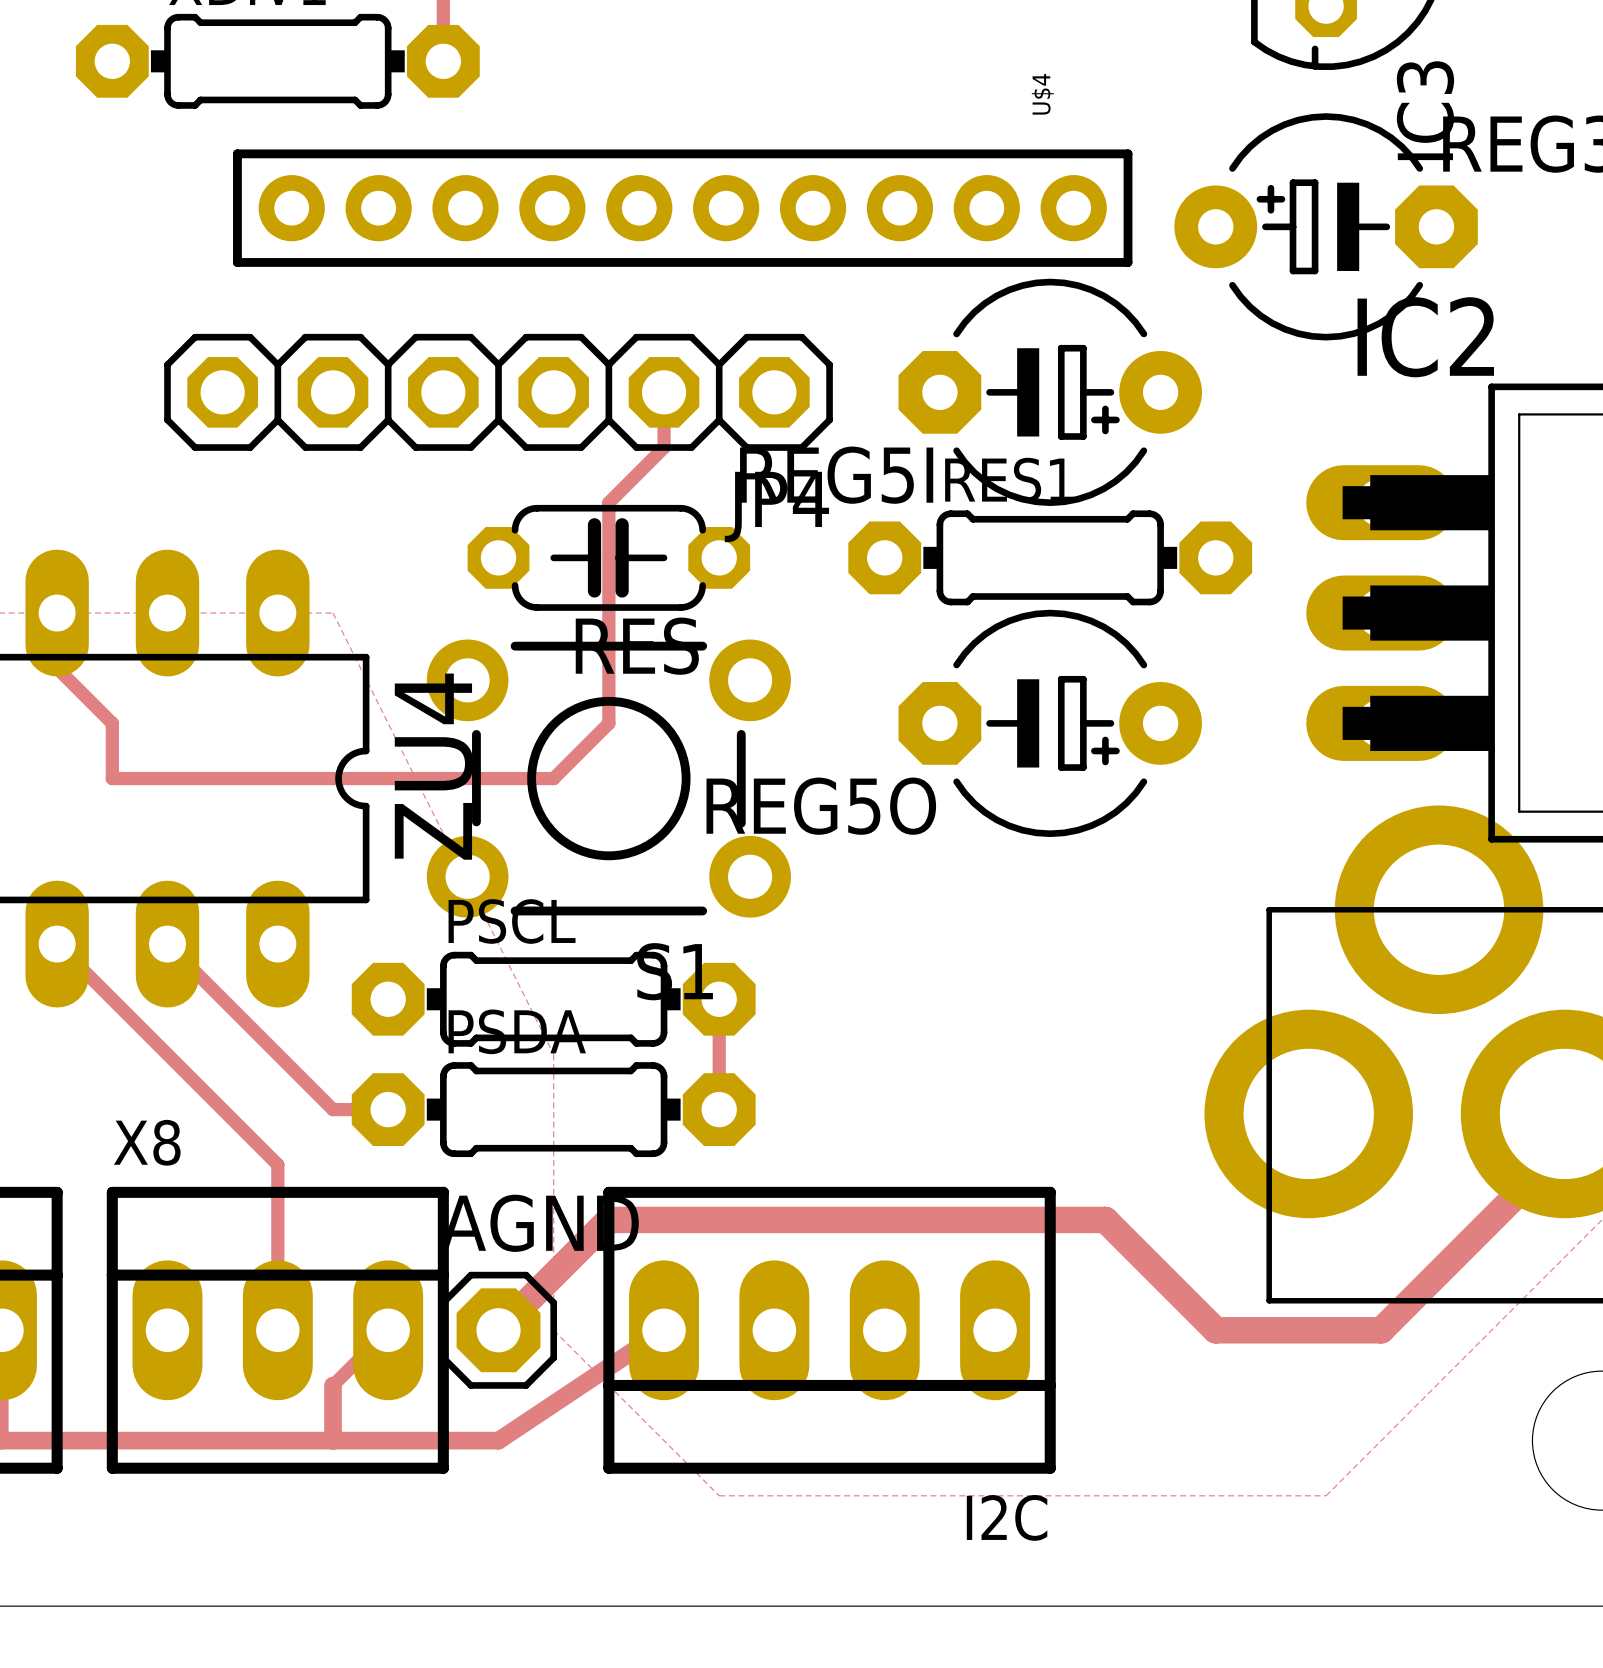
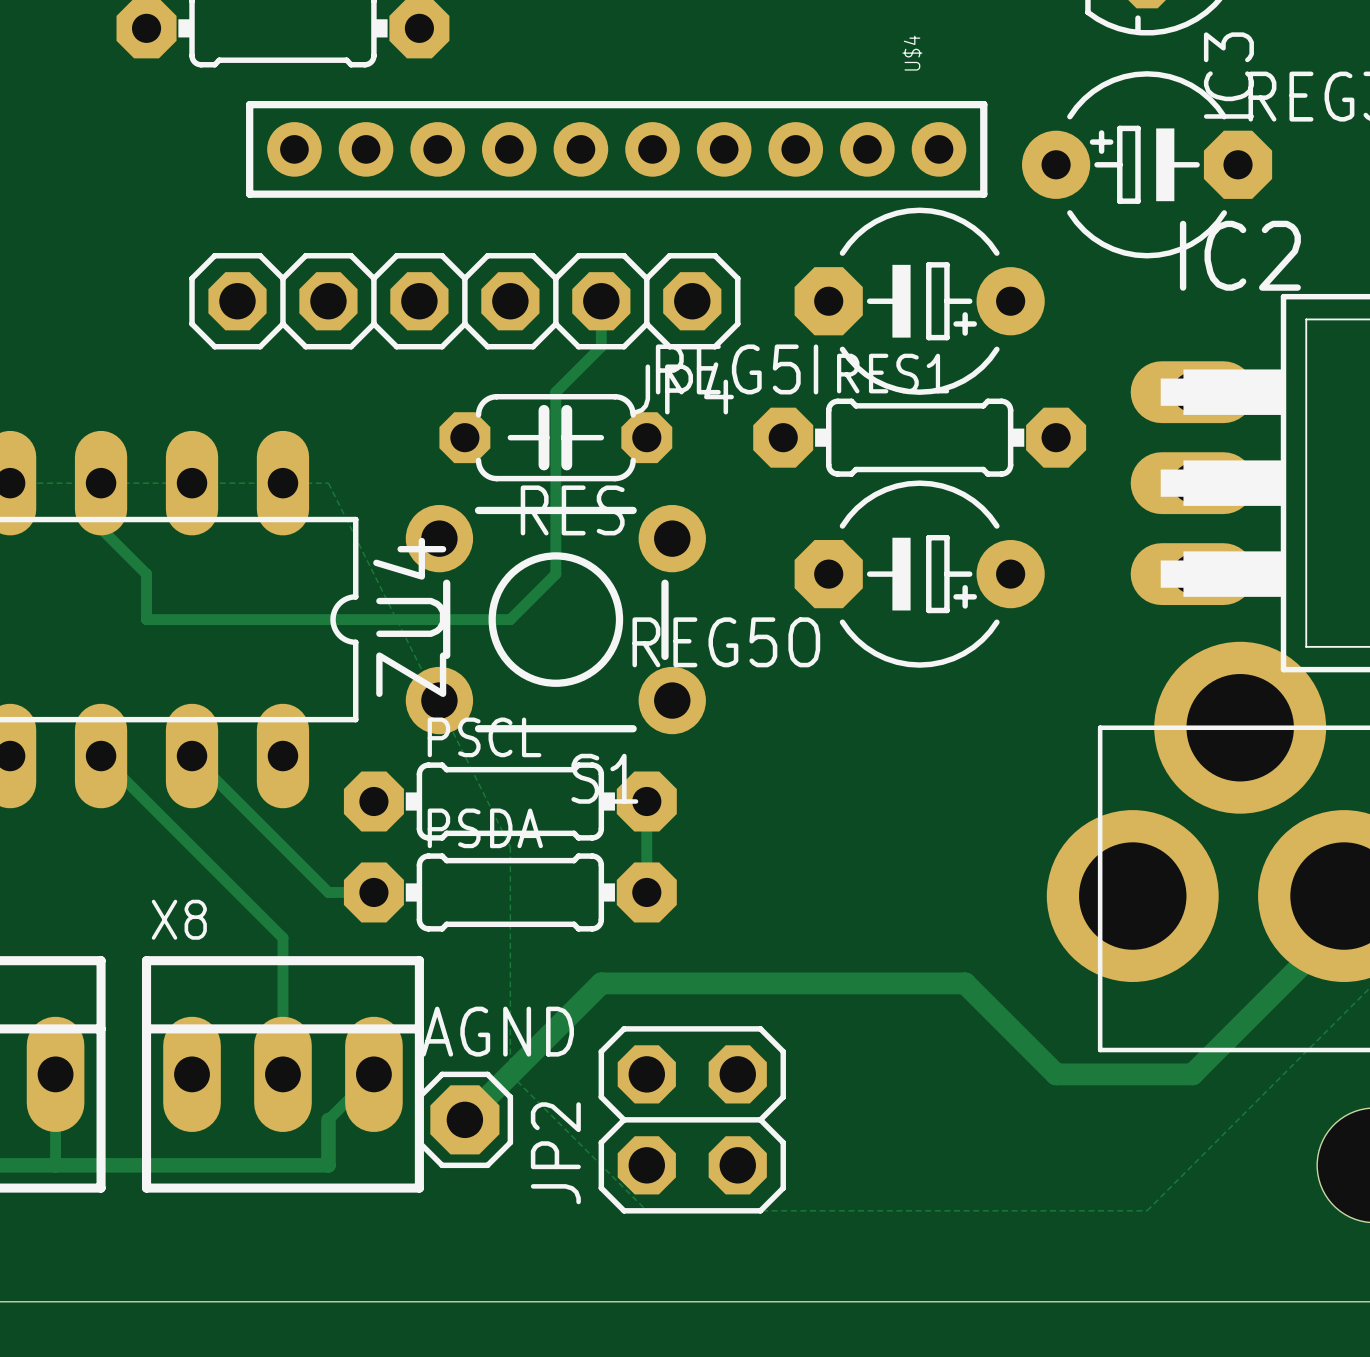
track: (664, 1219) (608, 1219) (498, 1330) -> (601, 983) (464, 1119)
AGND position: (498, 1330) -> (464, 1119)
track: (664, 1330) (498, 1440) (333, 1440) -> none
I2C: (829, 1330) -> none
JP2: none -> (692, 1119)

